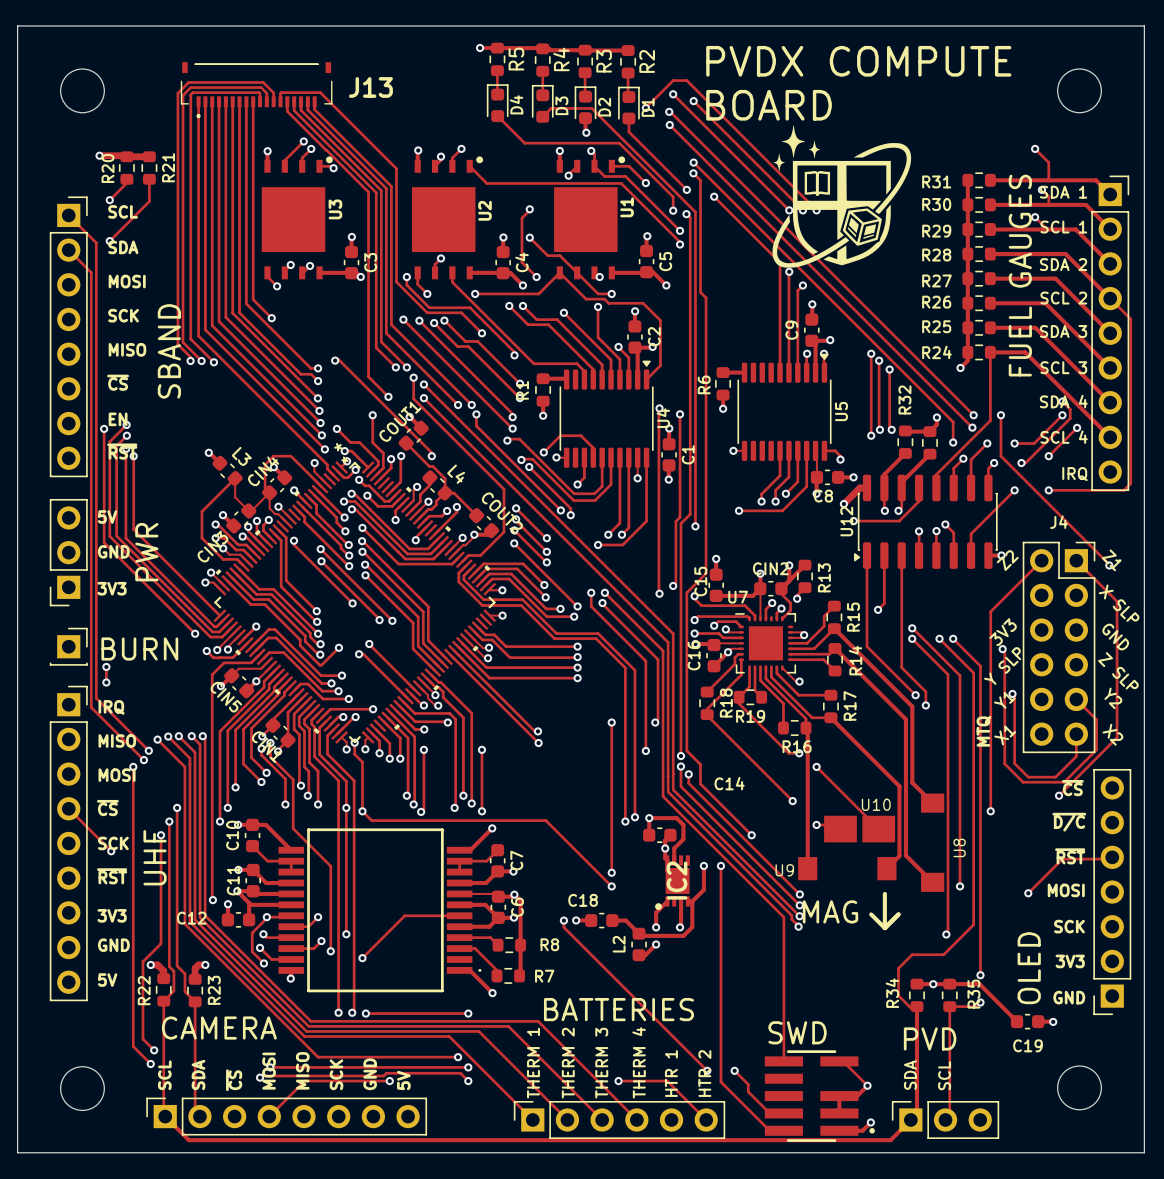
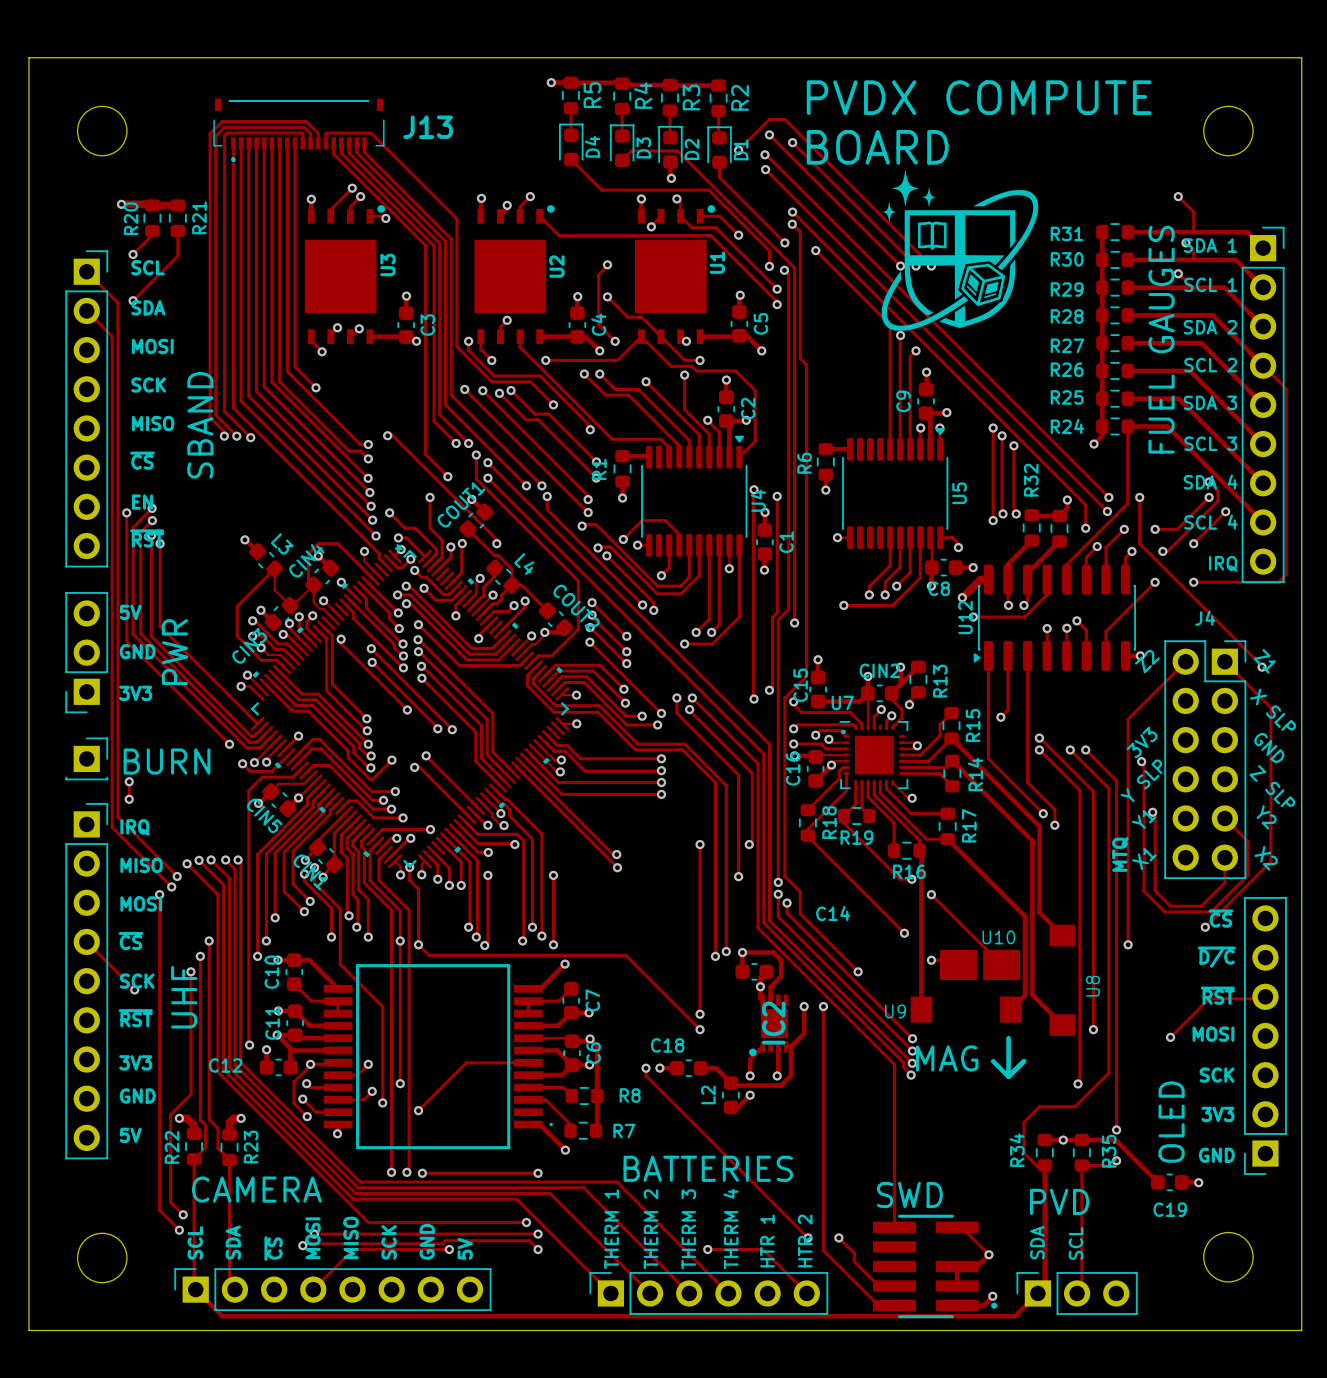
part text: * (338, 447) -> none
U7 footprint: [735, 613, 797, 674] -> [839, 720, 909, 790]

